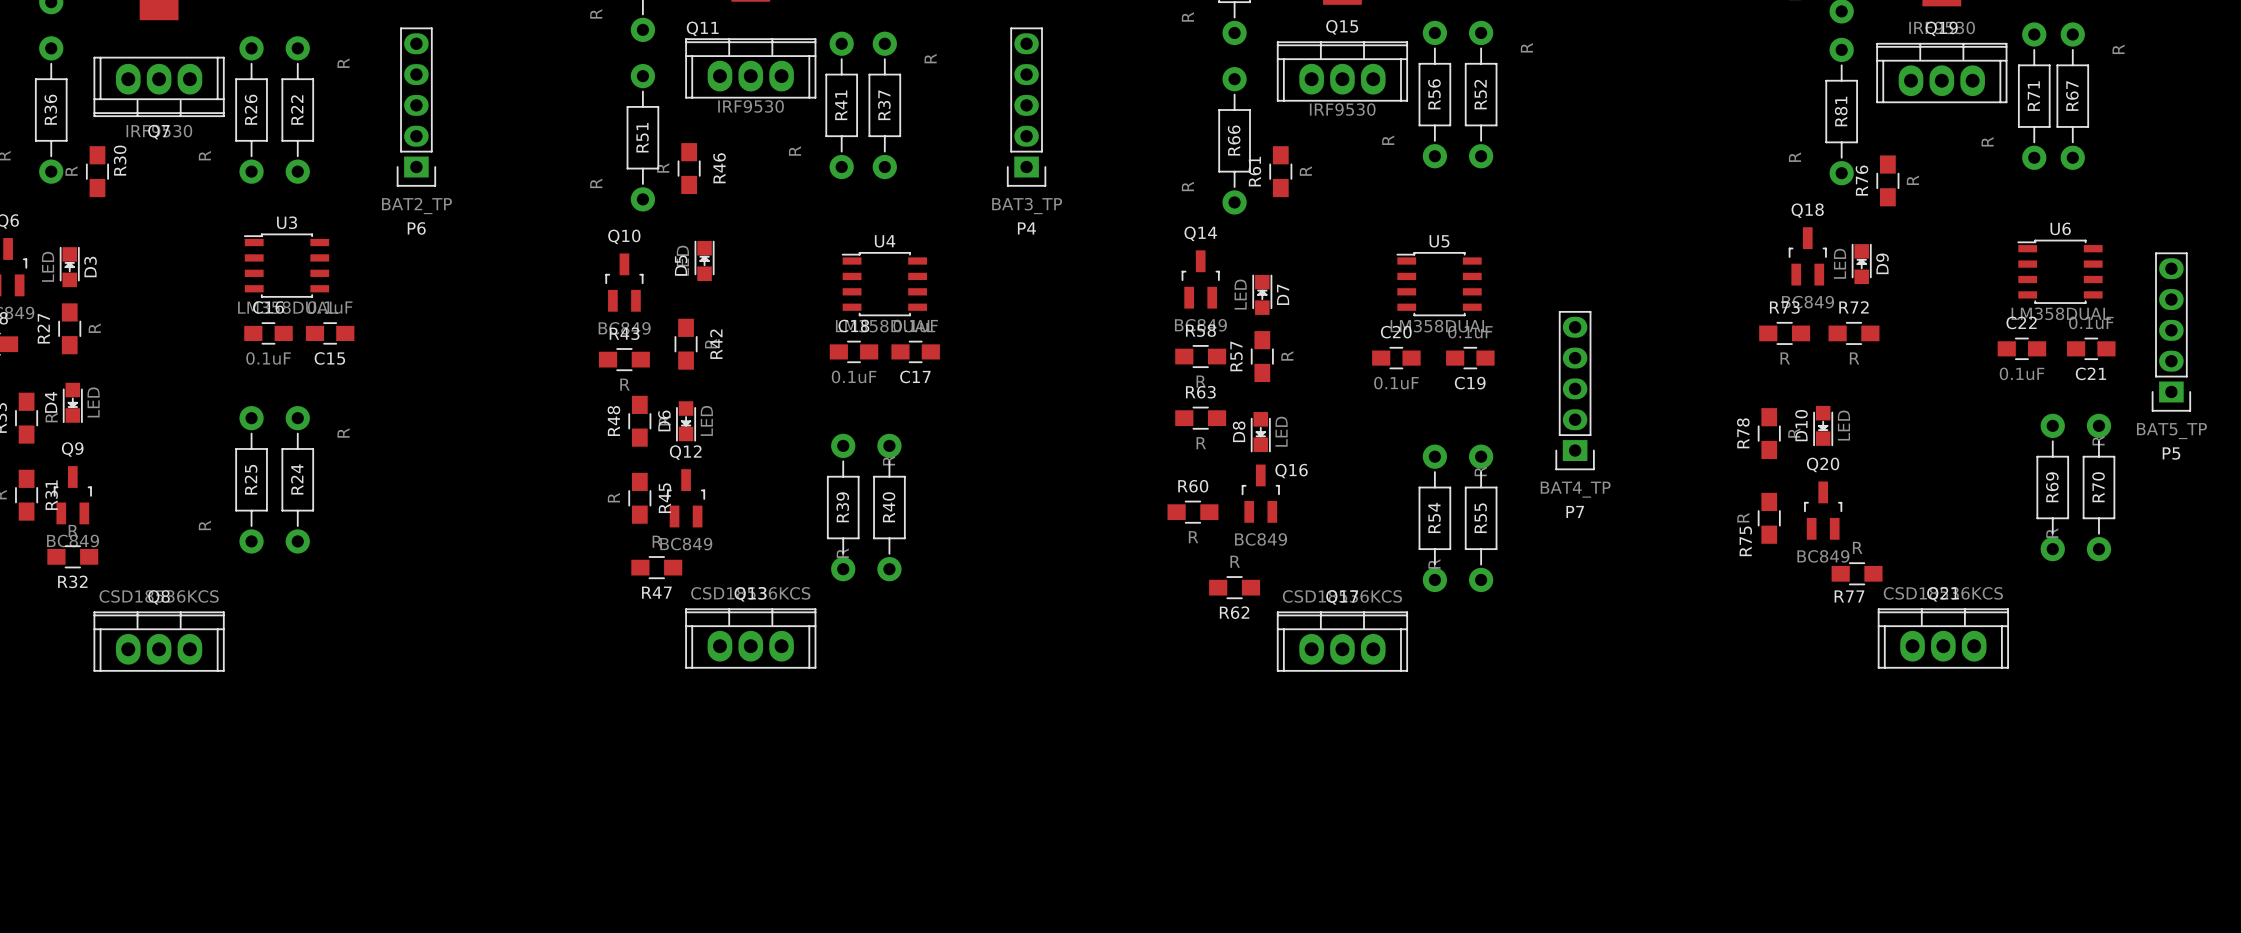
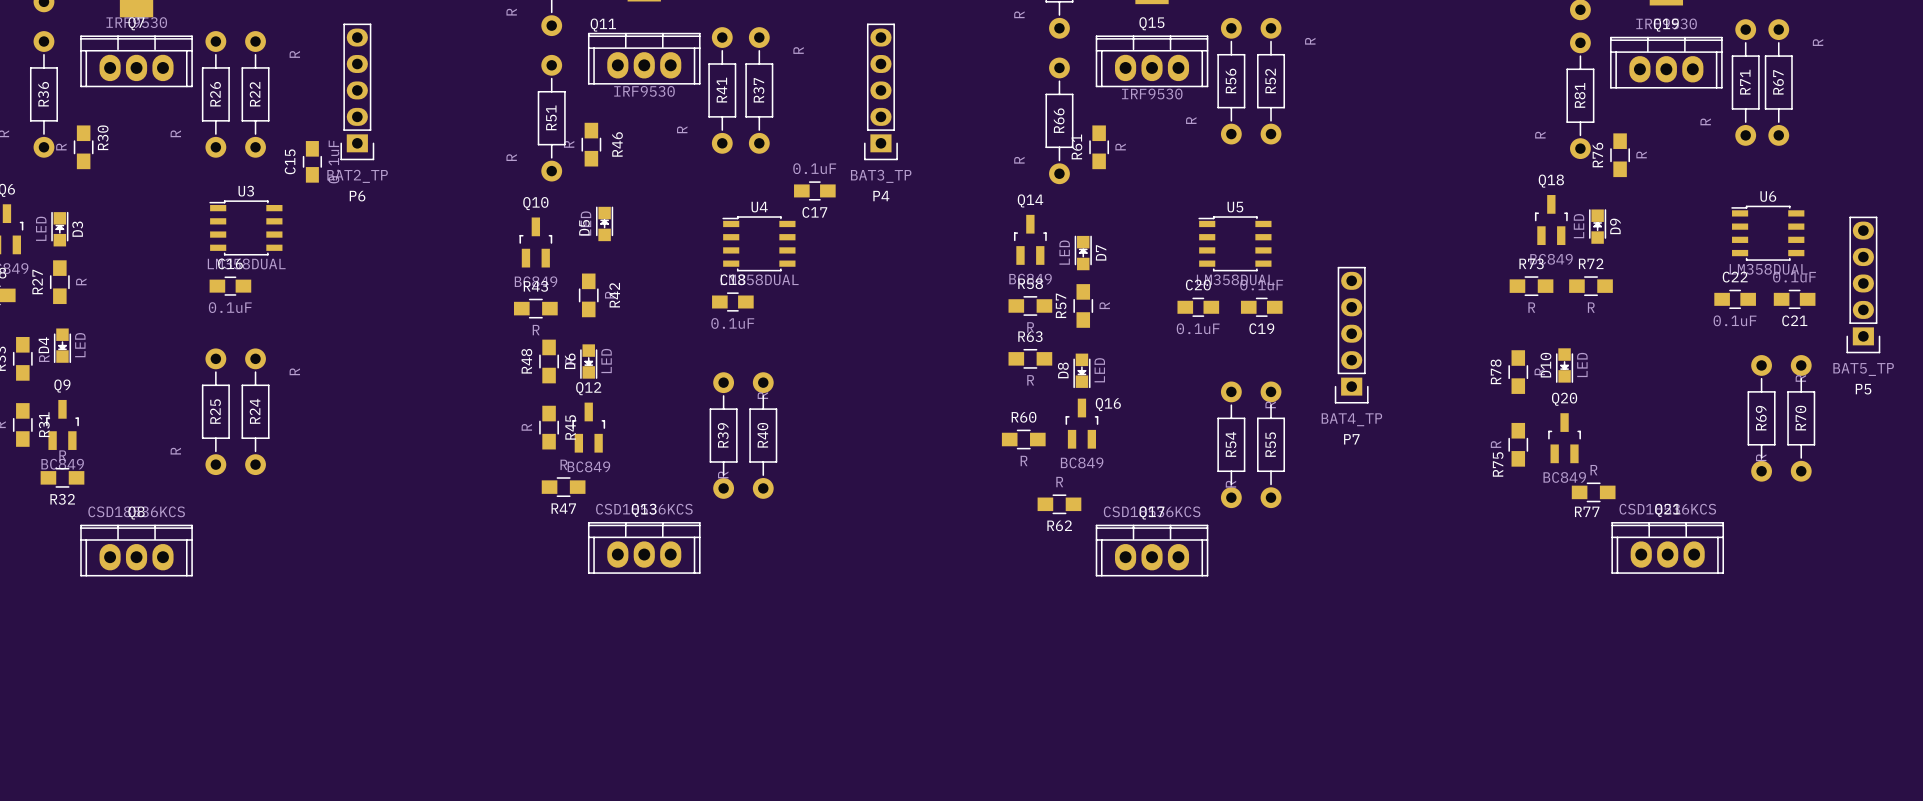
Q7 rotation: 0° (159, 86) -> 180° (136, 61)
C15 rotation: 0° (330, 333) -> 90° clockwise (312, 161)
C15 position: (330, 333) -> (312, 161)
C17 position: (915, 351) -> (814, 190)

